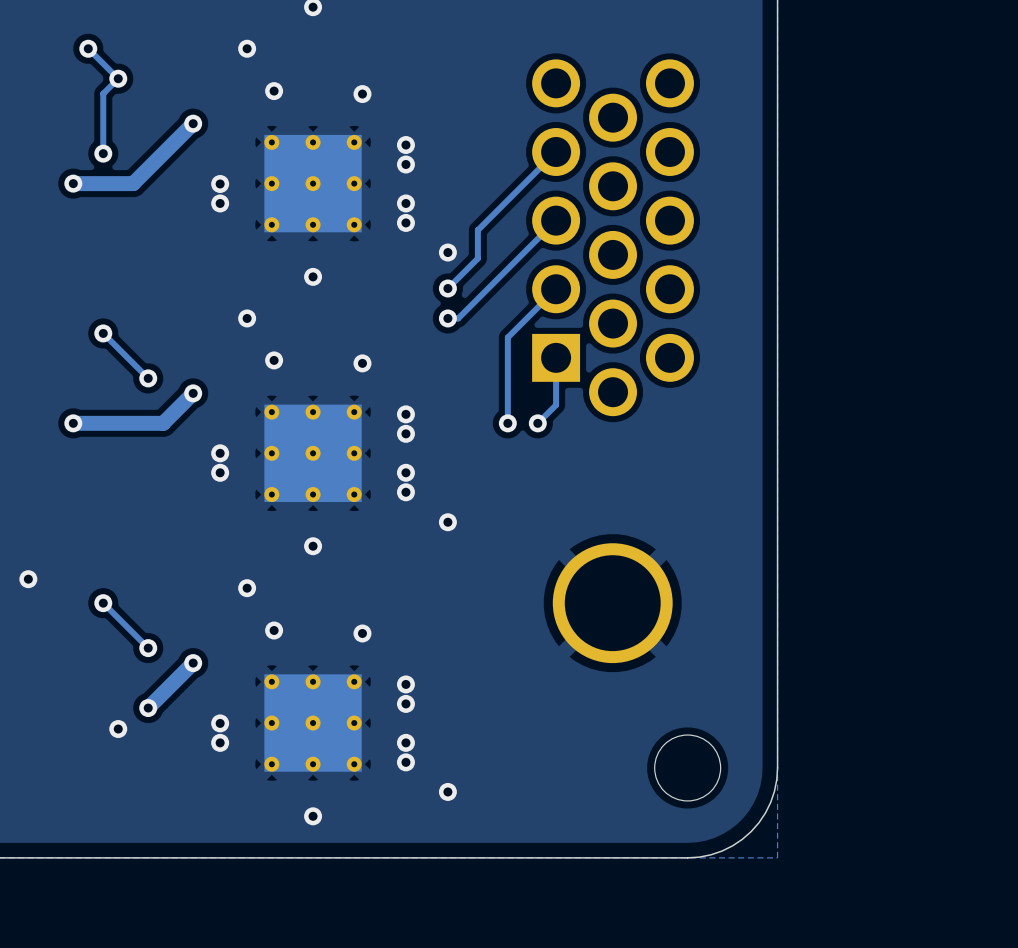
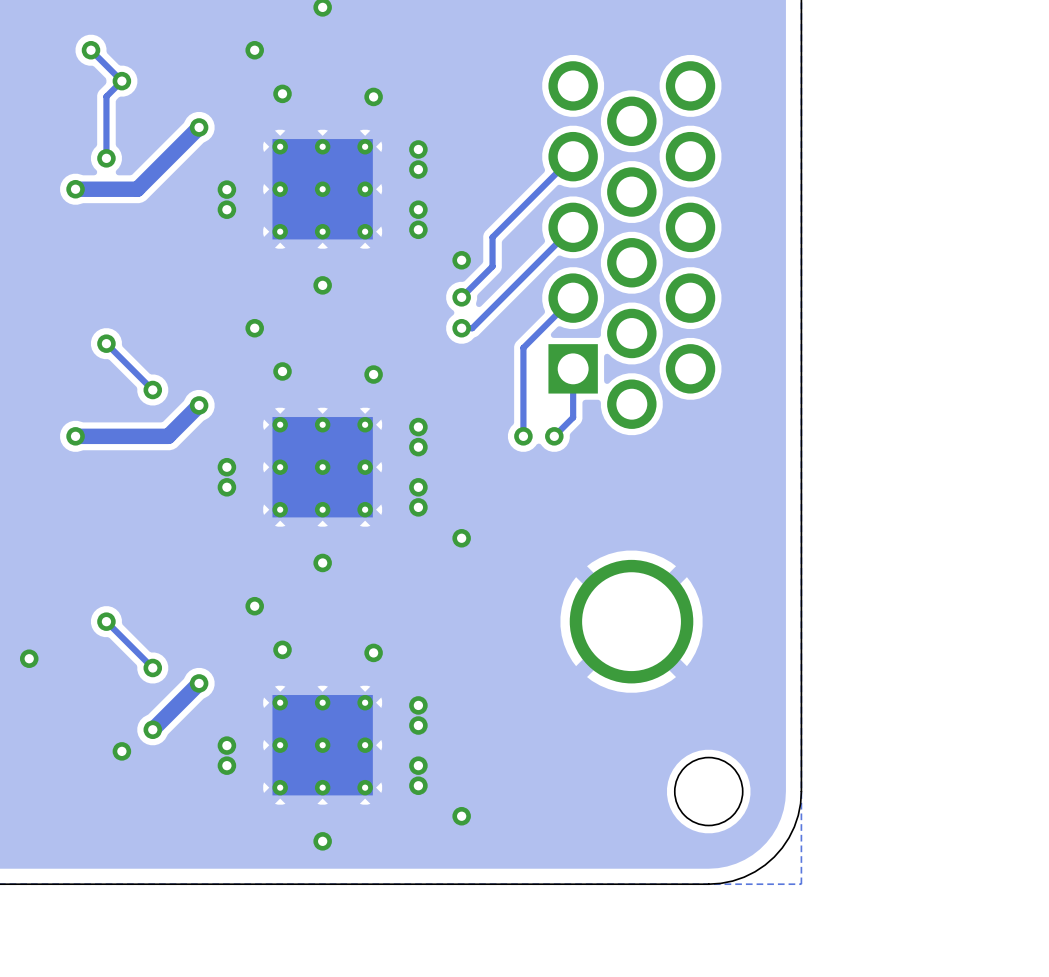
via: (28, 579) -> none
via: none -> (29, 658)

